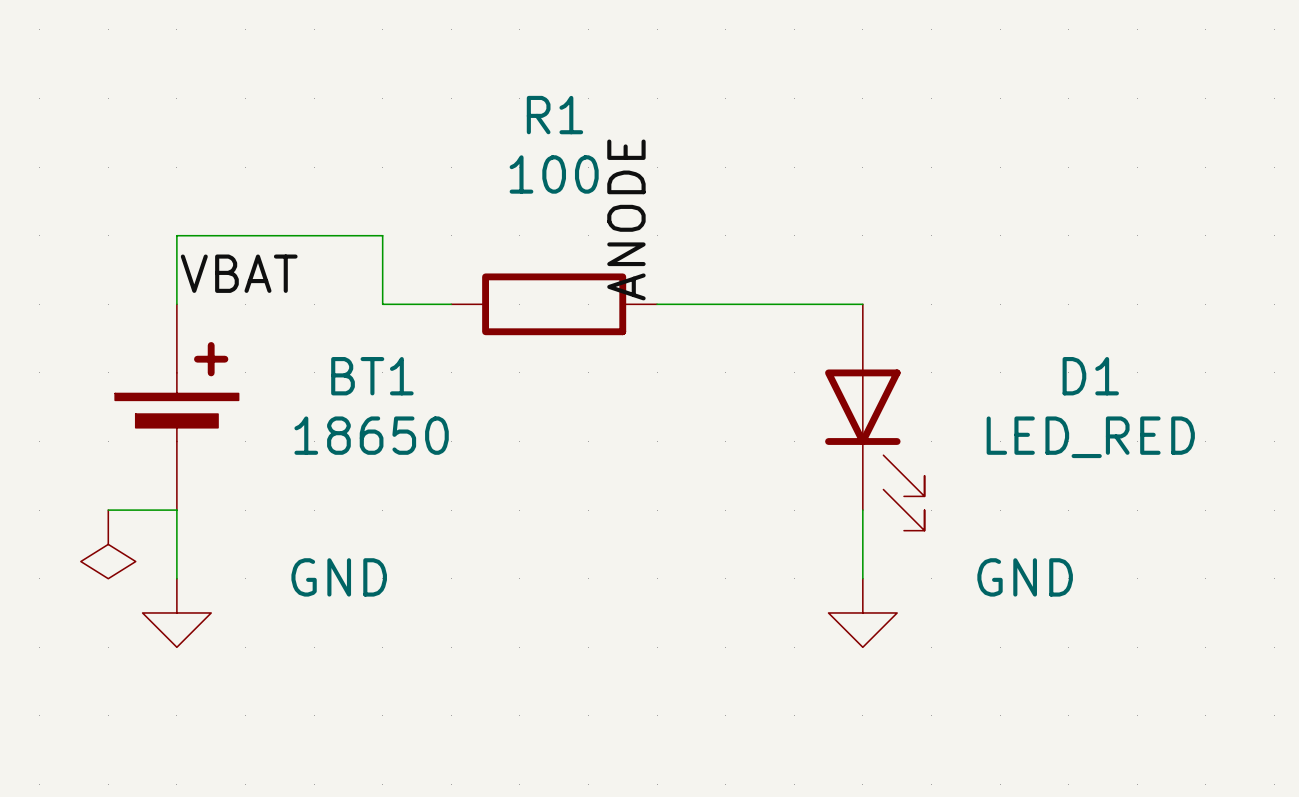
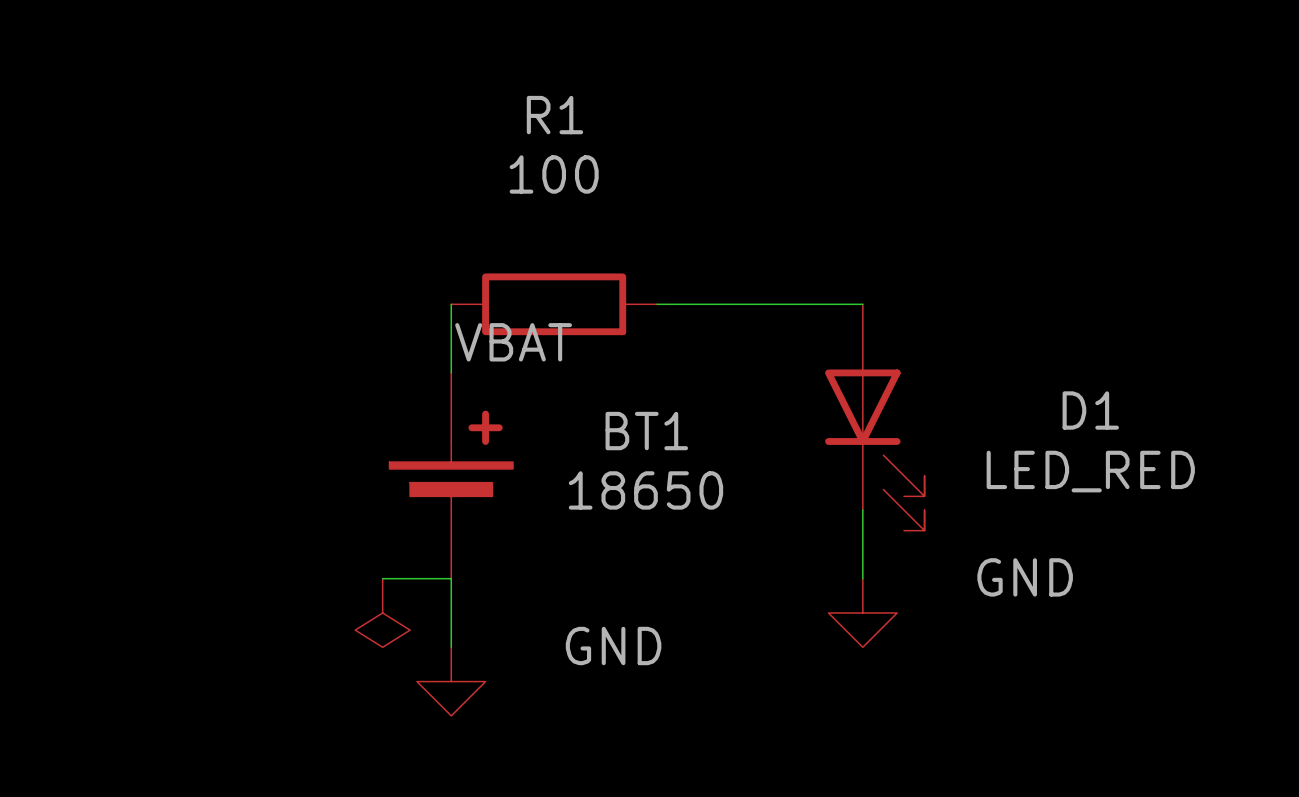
label: ANODE (626, 219) -> none
label position: VBAT (239, 273) -> VBAT (513, 342)
wire: (176, 304) (176, 235) (382, 235) (382, 304) (451, 304) -> (451, 372) (451, 304)
BT1 name position: BT1 (372, 376) -> BT1 (646, 431)
D1 name position: D1 (1090, 376) -> D1 (1090, 410)
BT1 position: (176, 407) -> (451, 475)
BT1 value position: 18650 (371, 435) -> 18650 (645, 490)
D1 value position: LED_RED (1090, 437) -> LED_RED (1090, 471)
wire: (108, 510) (176, 510) (176, 578) -> (382, 578) (451, 578) (451, 647)
power symbol position: (108, 544) -> (382, 612)
power symbol position: GND (176, 612) -> GND (451, 681)

